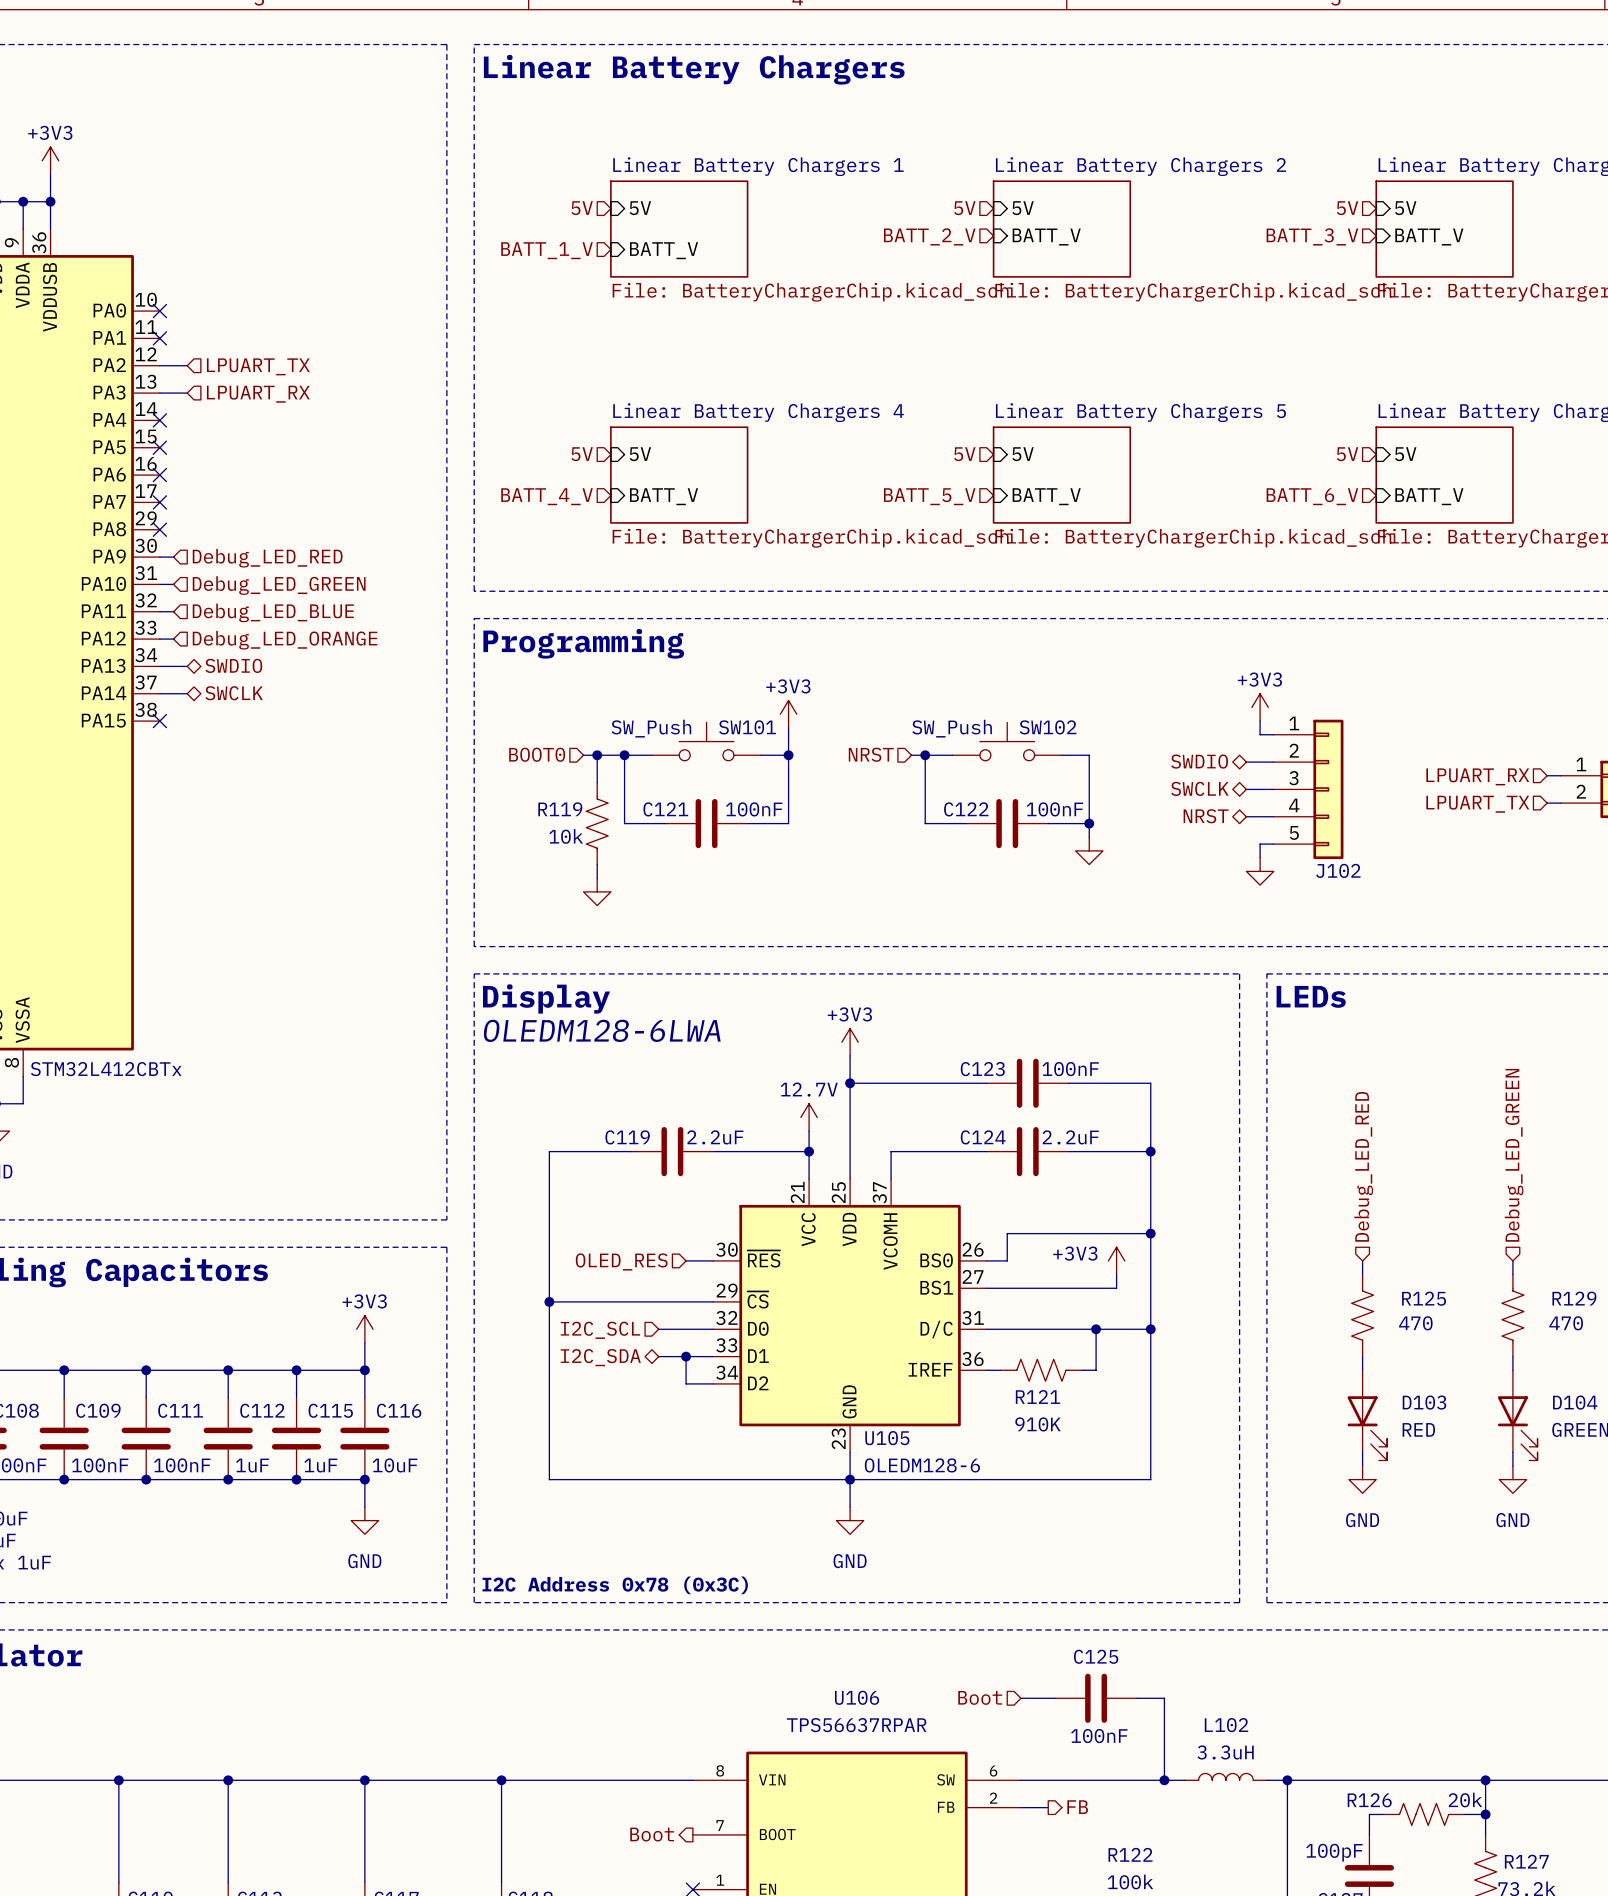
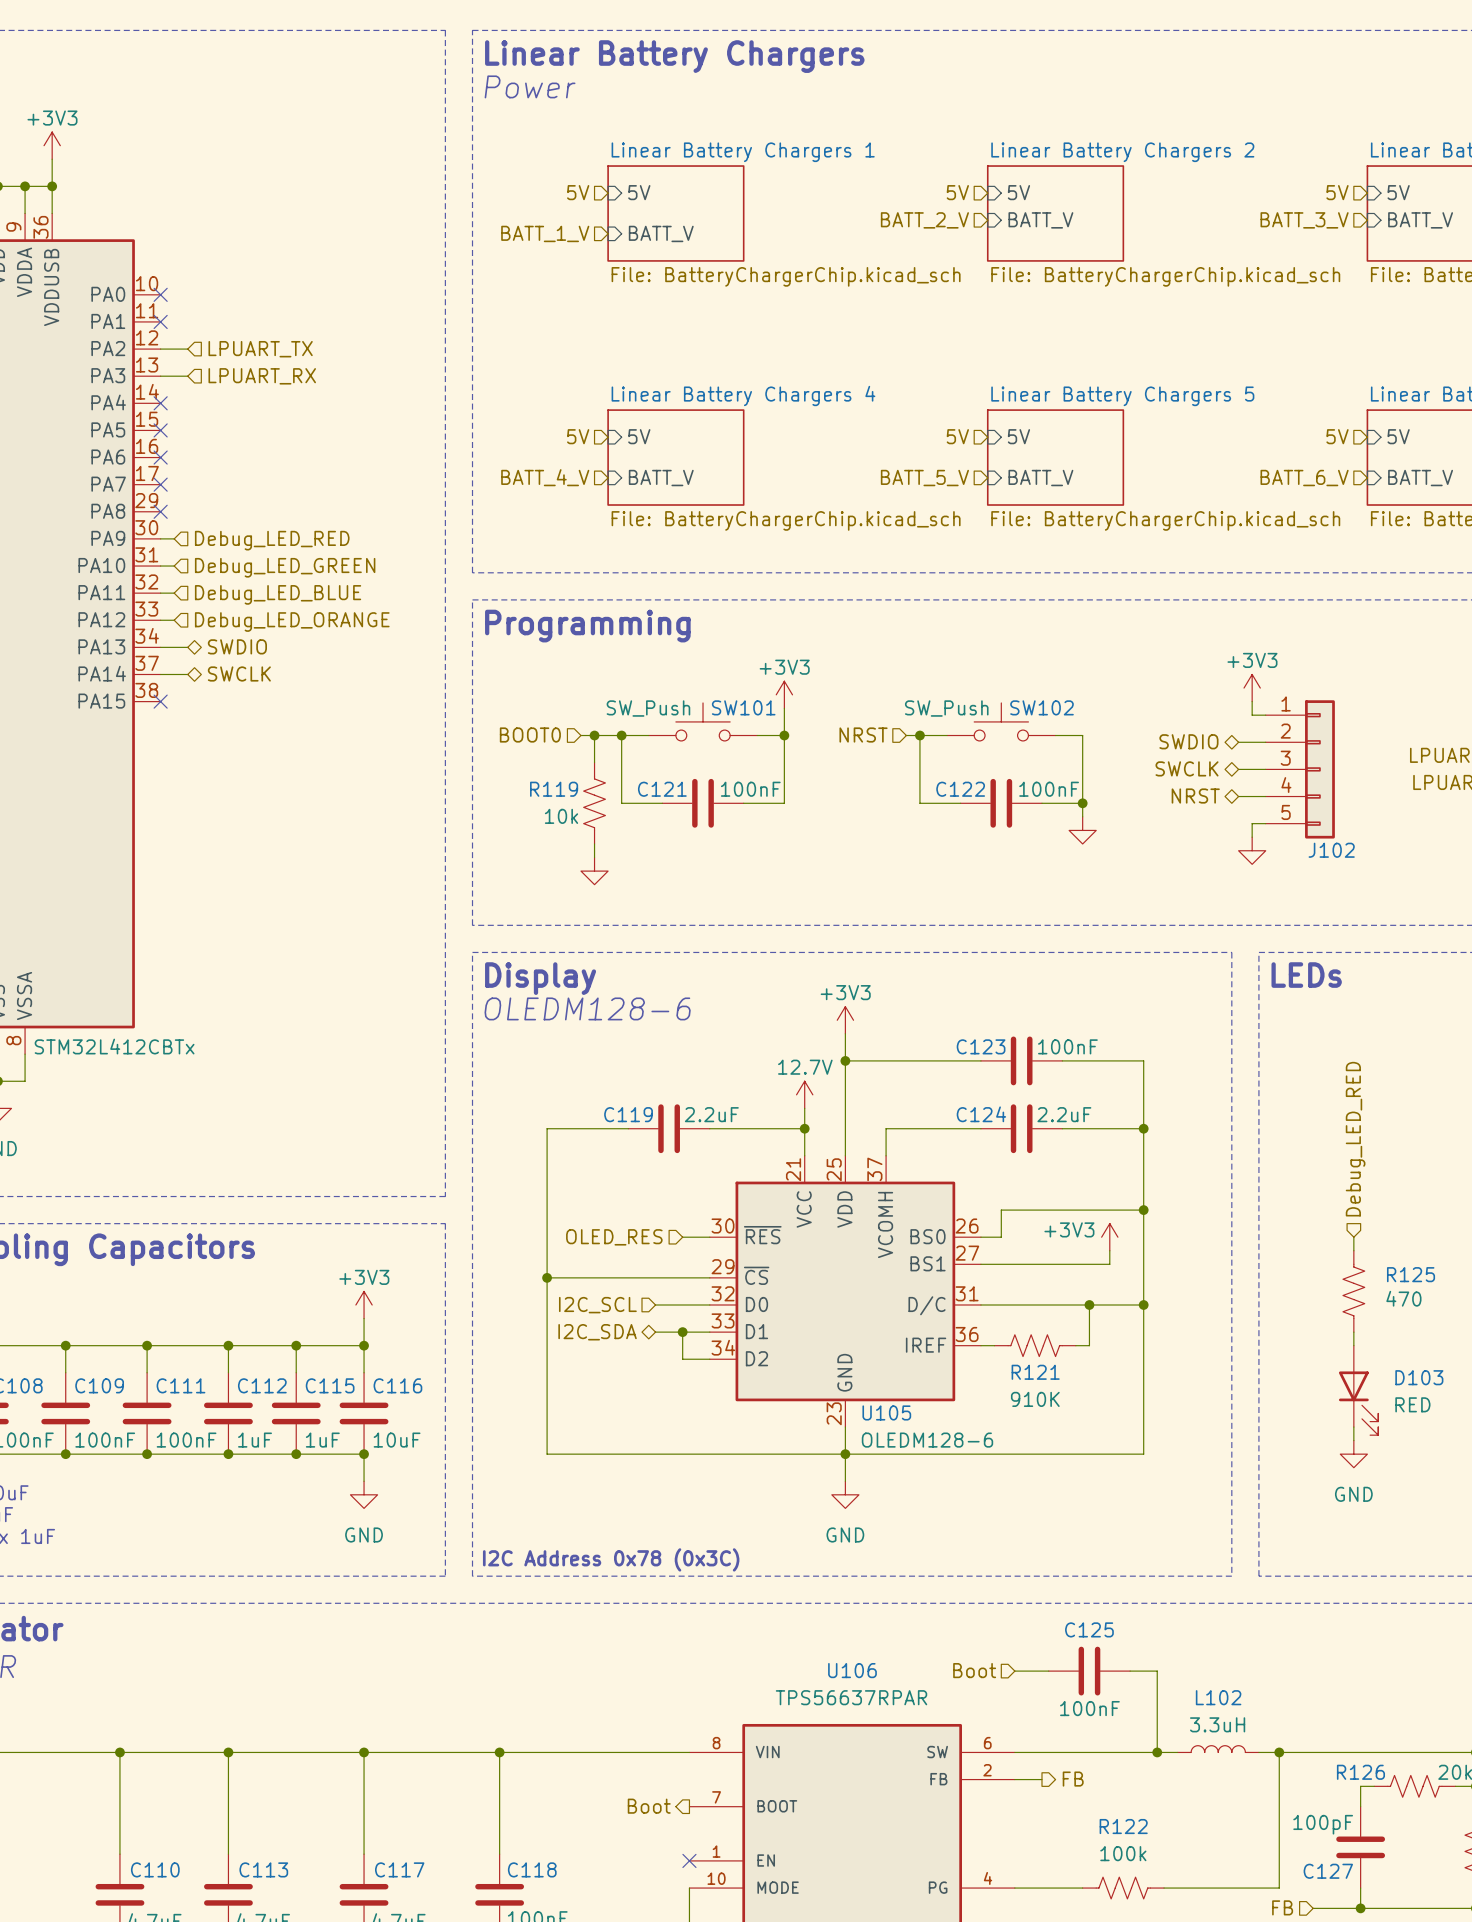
text: none -> Power (530, 86)
text: OLEDM128-6LWA (602, 1030) -> OLEDM128-6 (587, 1008)

